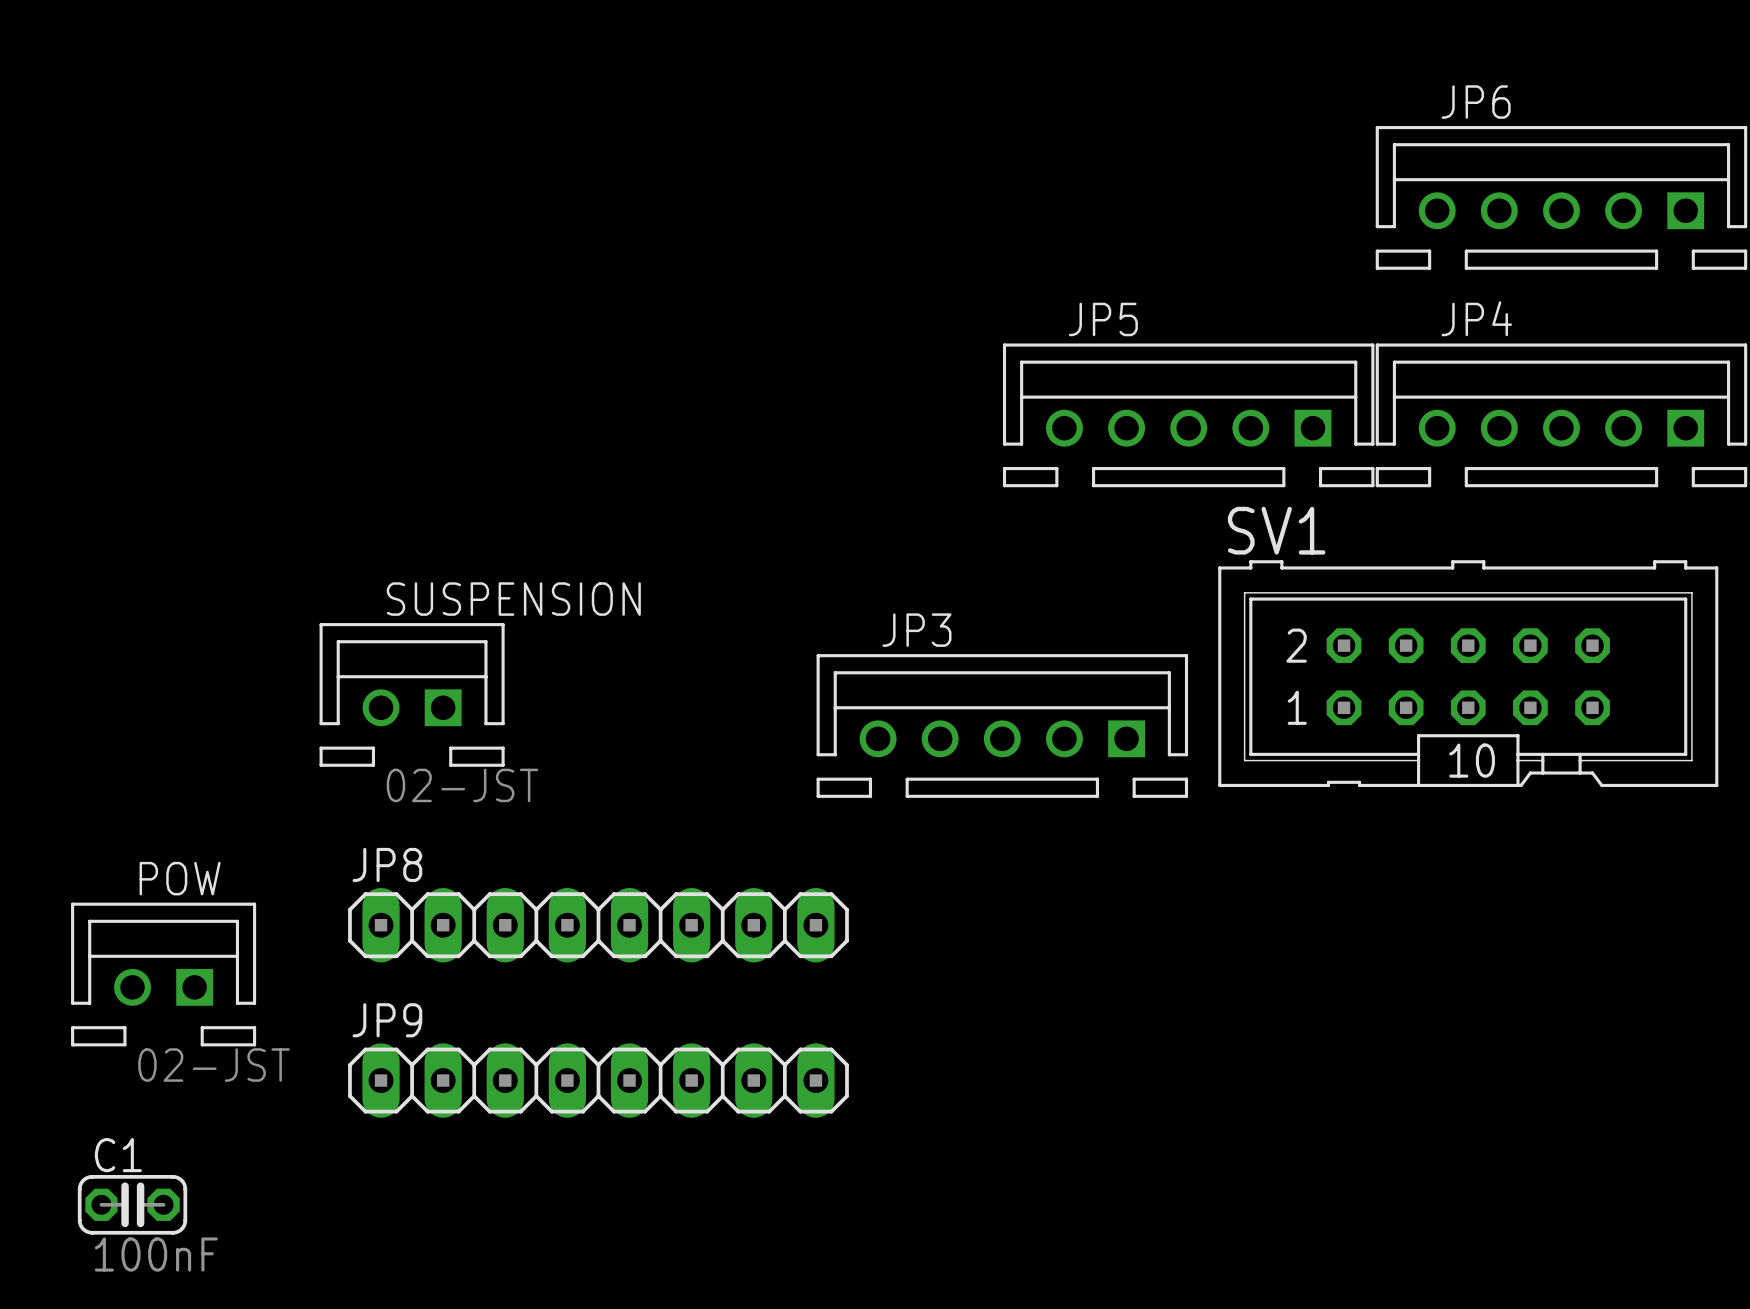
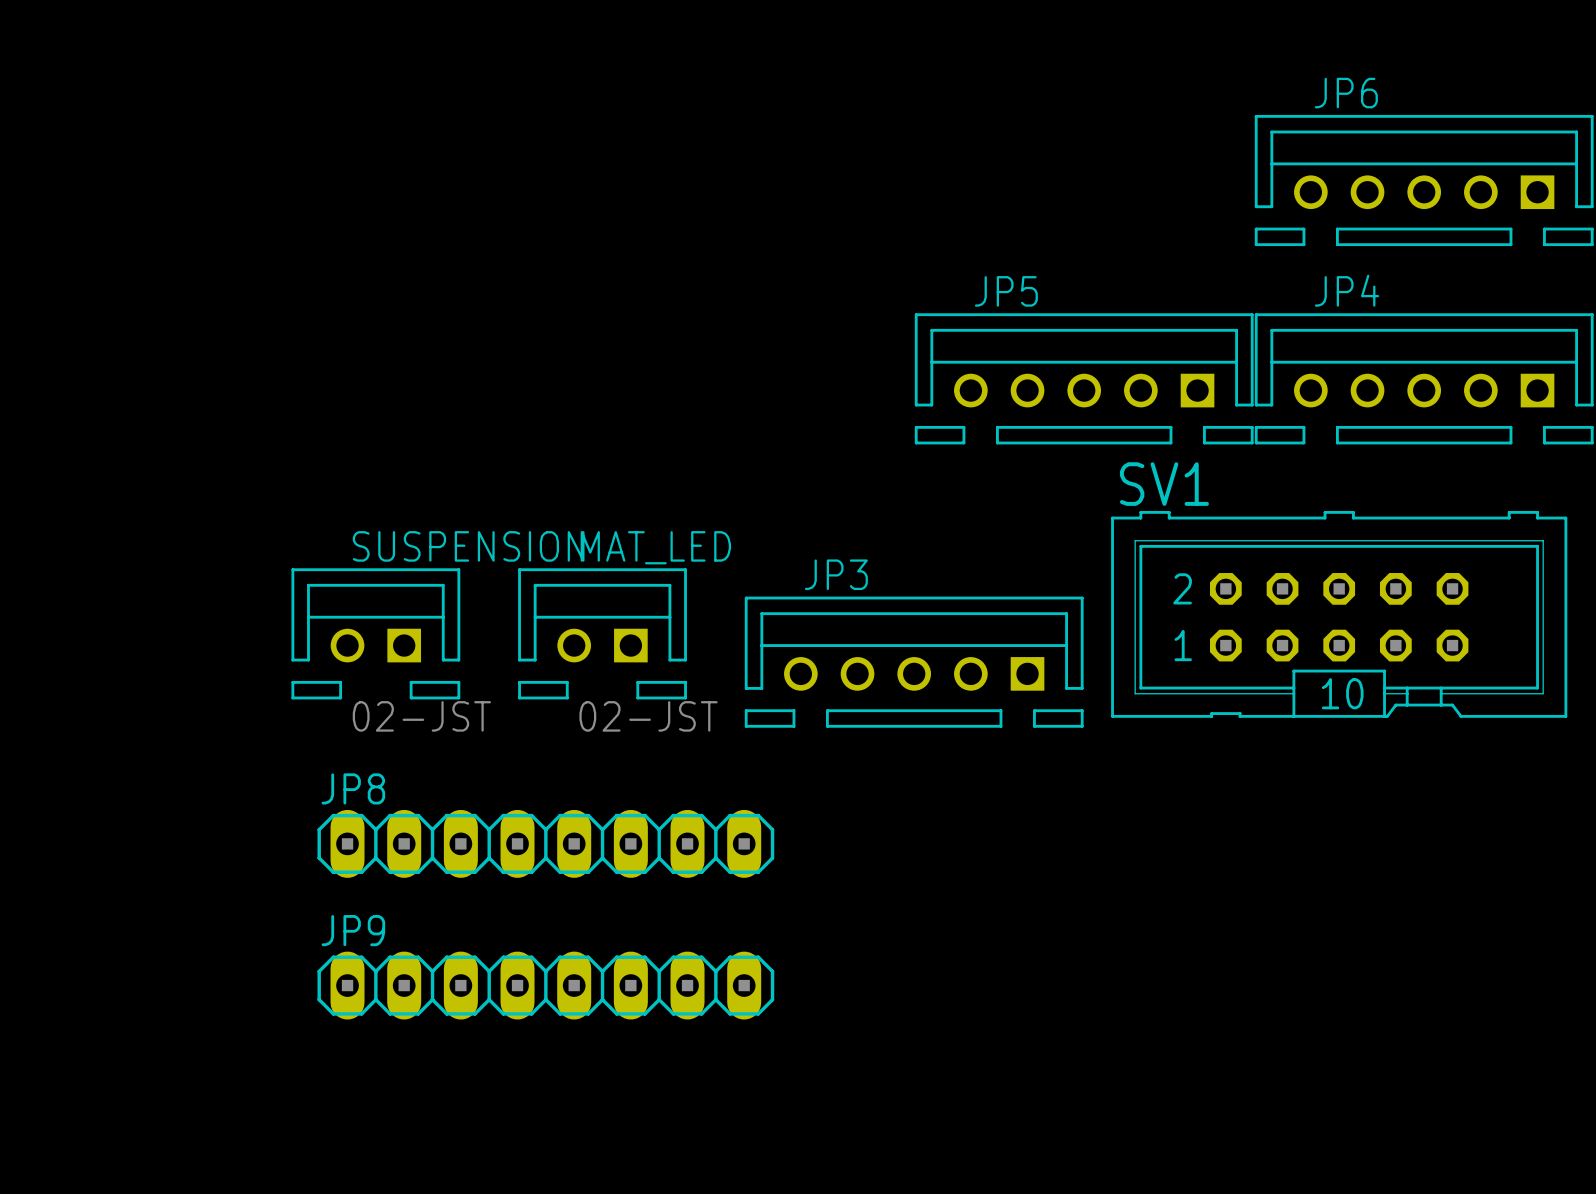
MAT_LED: none -> 02-JST (602, 633)
POW: 02-JST (163, 974) -> none
C1: 100nF (132, 1204) -> none

